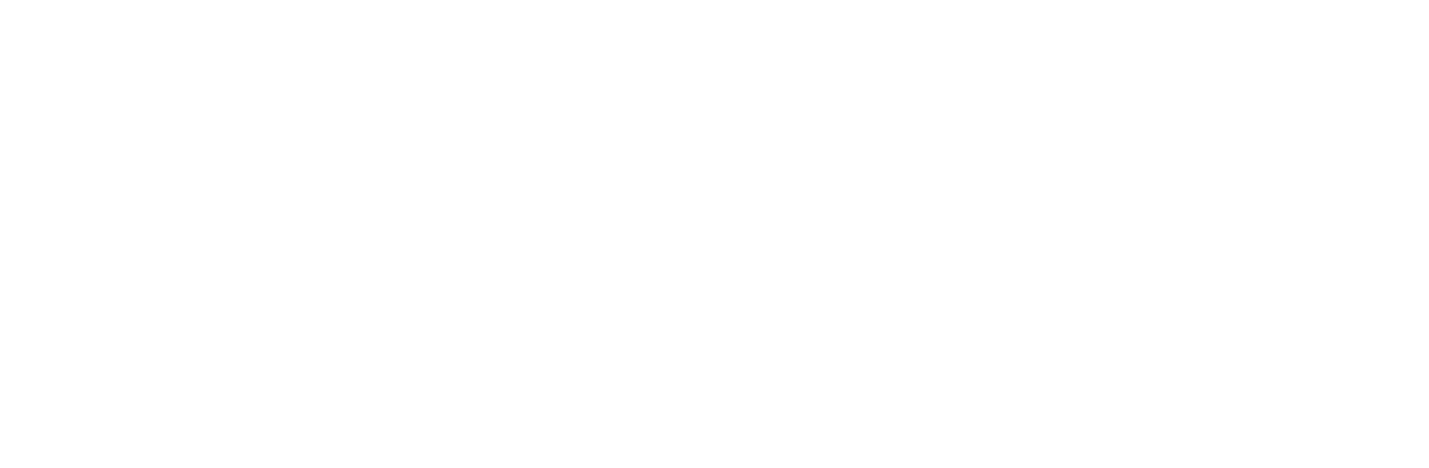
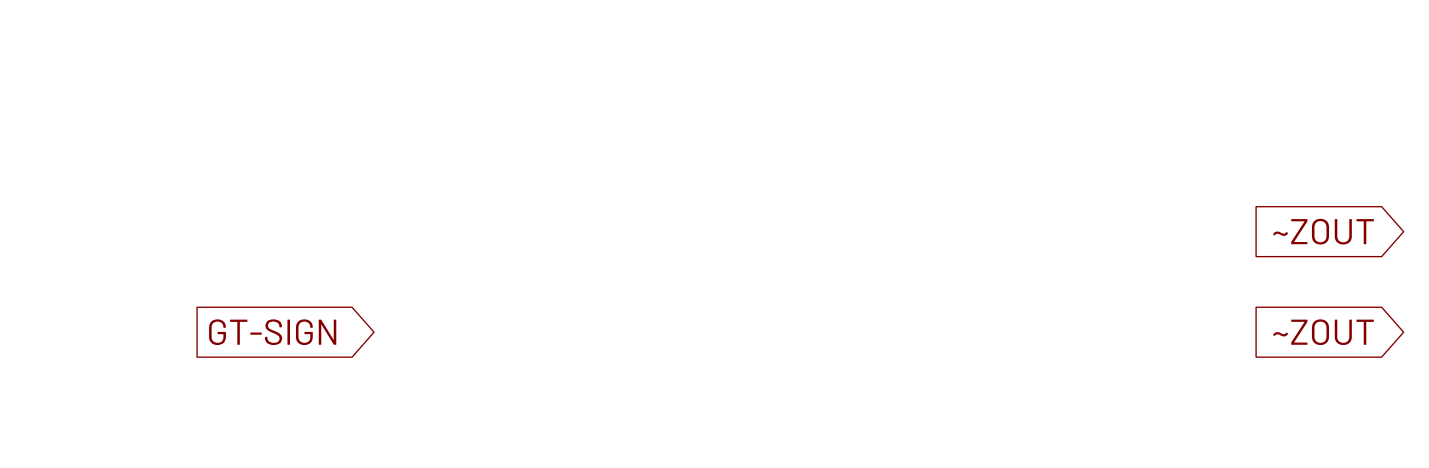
global label: none -> ~ZOUT (1323, 231)
global label: none -> GT-SIGN (272, 332)
global label: none -> ~ZOUT (1323, 332)

